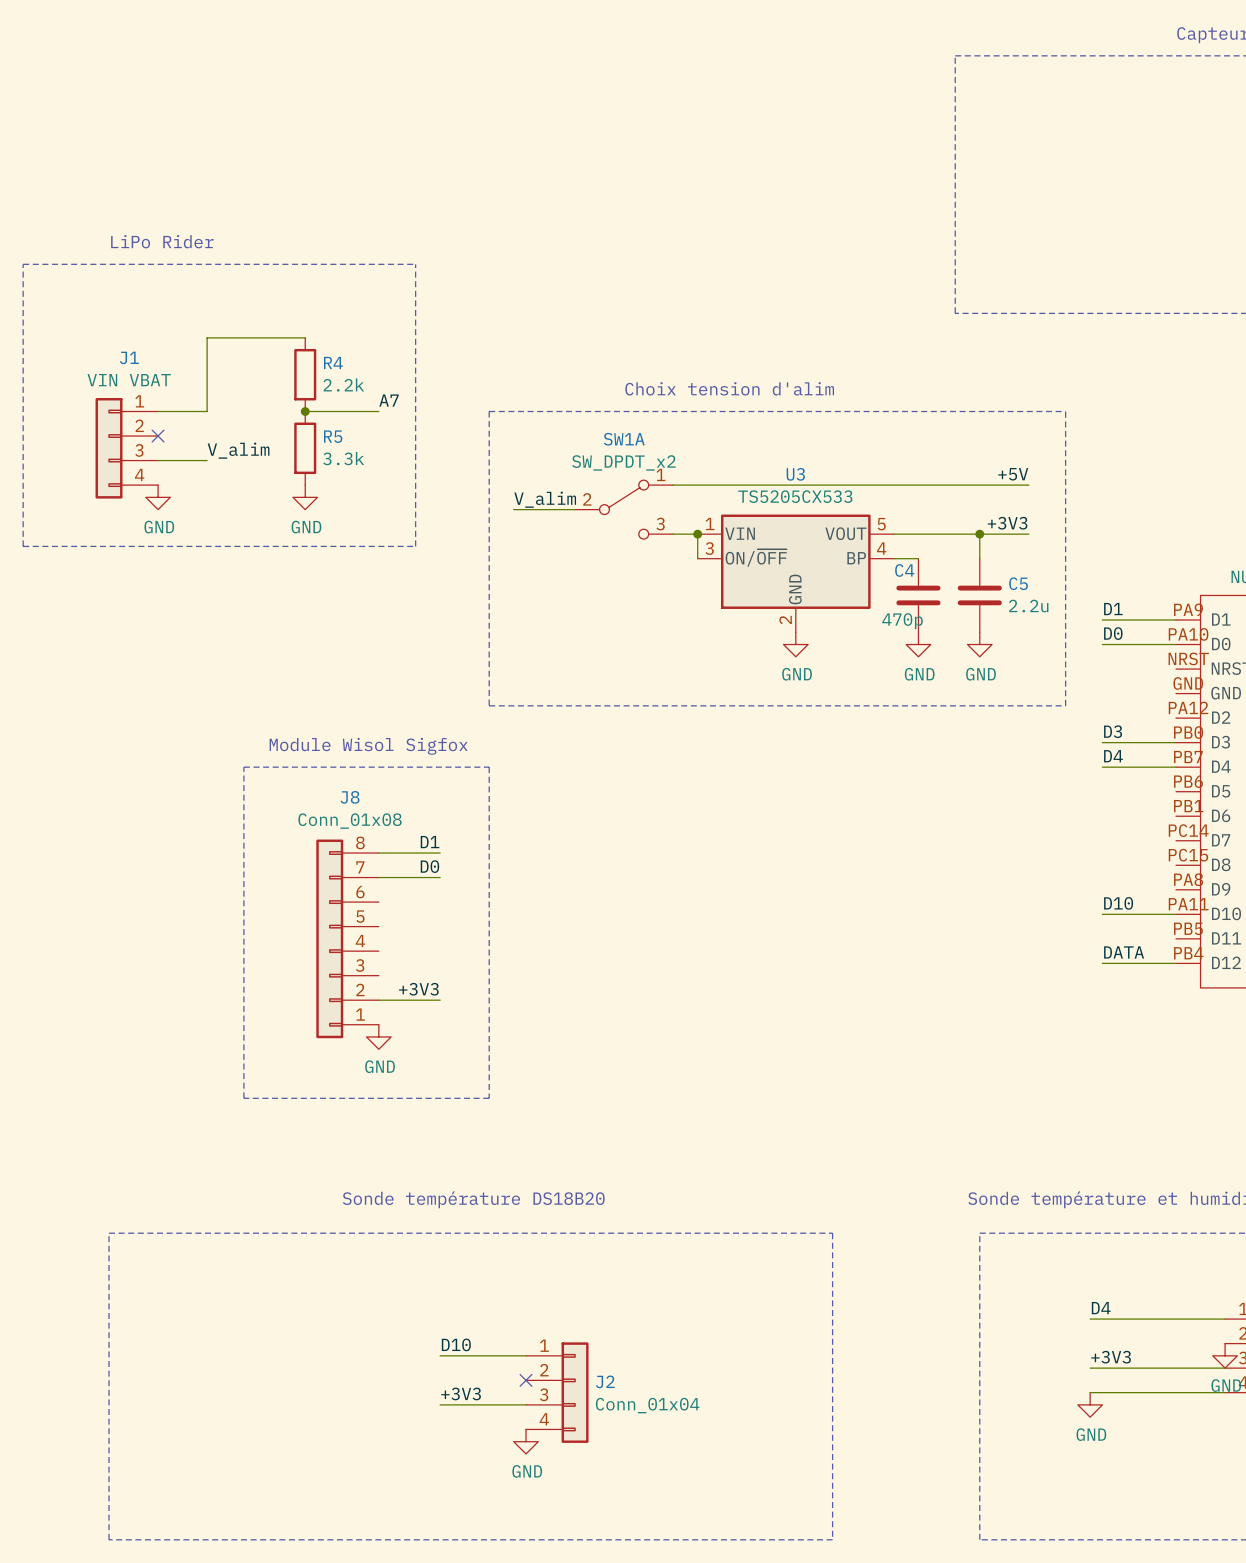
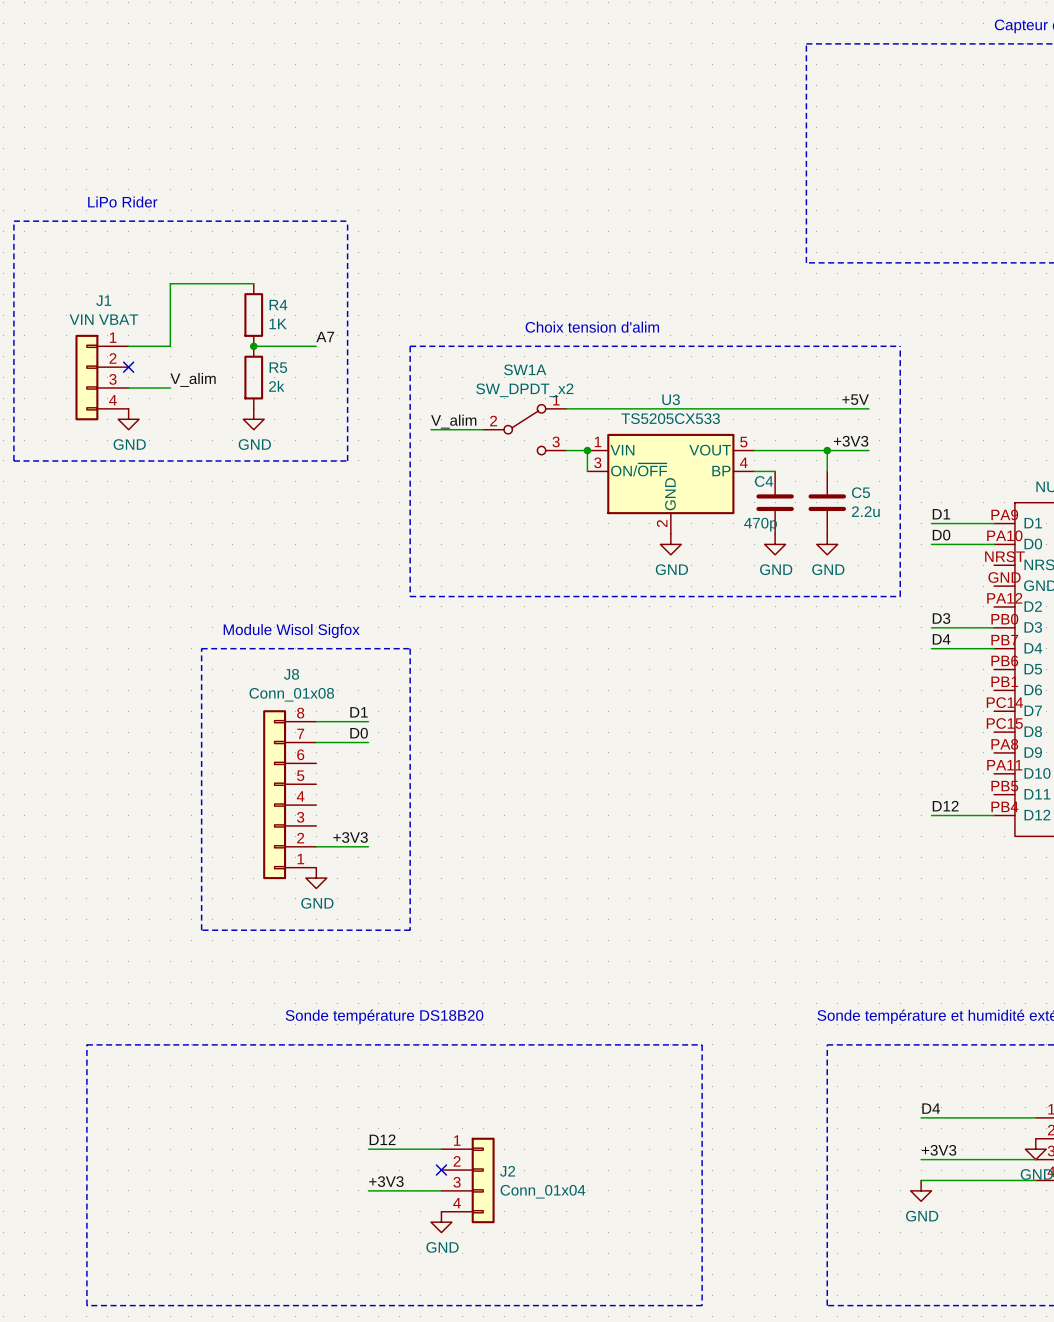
R4 value: 2.2k (343, 385) -> 1K (278, 324)
R5 value: 3.3k (343, 458) -> 2k (276, 386)
label: D10 (1118, 903) -> none
wire: (1102, 914) (1176, 914) -> none
label: DATA (1124, 952) -> D12 (945, 806)
label: D10 (456, 1344) -> D12 (382, 1139)

